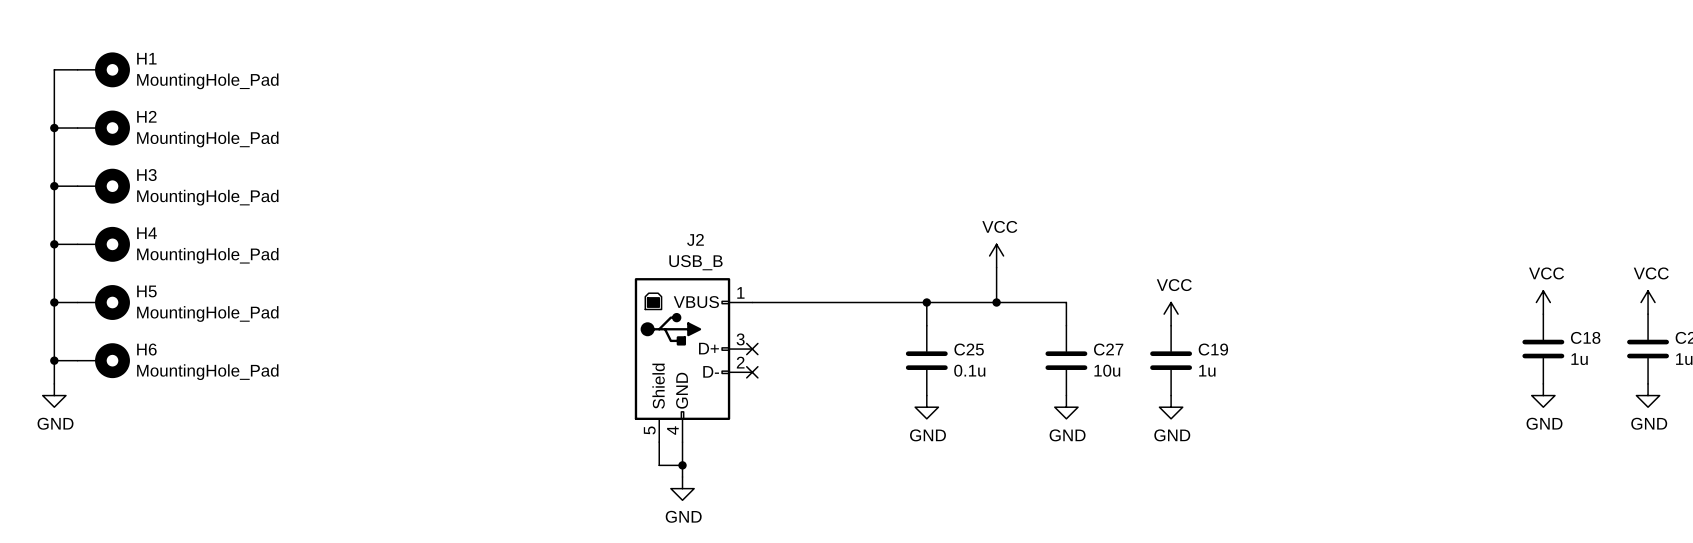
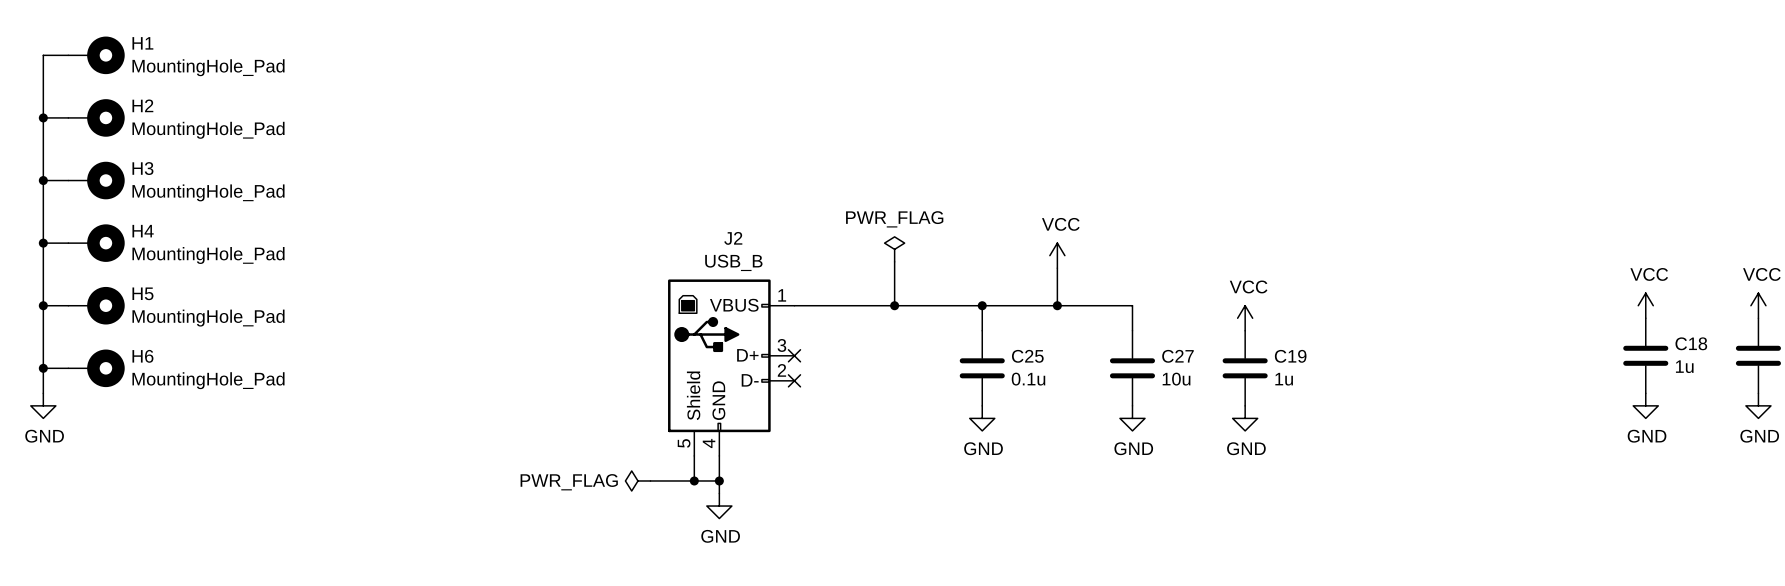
power symbol: none -> PWR_FLAG (894, 249)
wire: none -> (894, 261) (894, 305)
junction: none -> (894, 305)
power symbol: none -> PWR_FLAG (637, 480)
wire: none -> (650, 480) (694, 480)
junction: none -> (694, 480)

